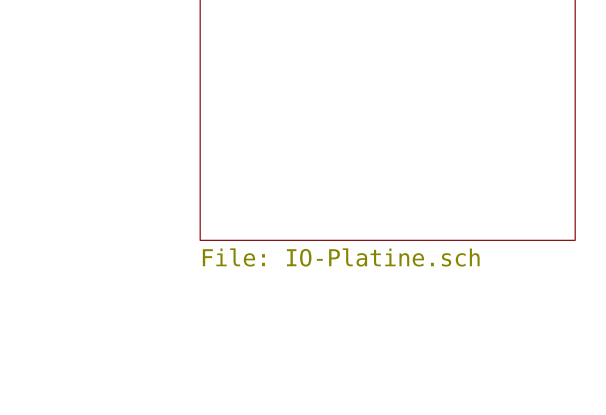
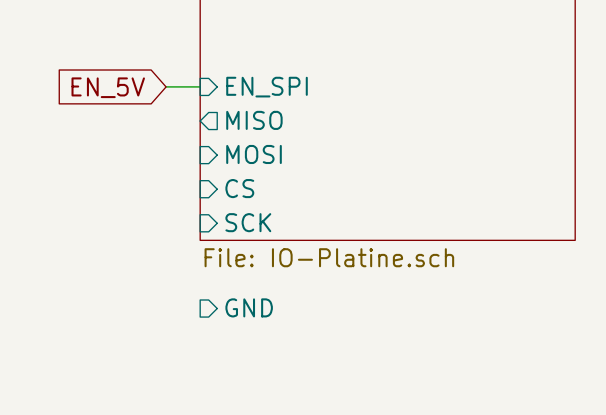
wire: none -> (166, 86) (200, 86)
sheet pin: none -> EN_SPI (267, 87)
global label: none -> EN_5V (108, 87)
sheet pin: none -> MISO (254, 120)
sheet pin: none -> MOSI (254, 154)
sheet pin: none -> CS (239, 188)
sheet pin: none -> SCK (248, 222)
sheet pin: none -> GND (249, 307)

